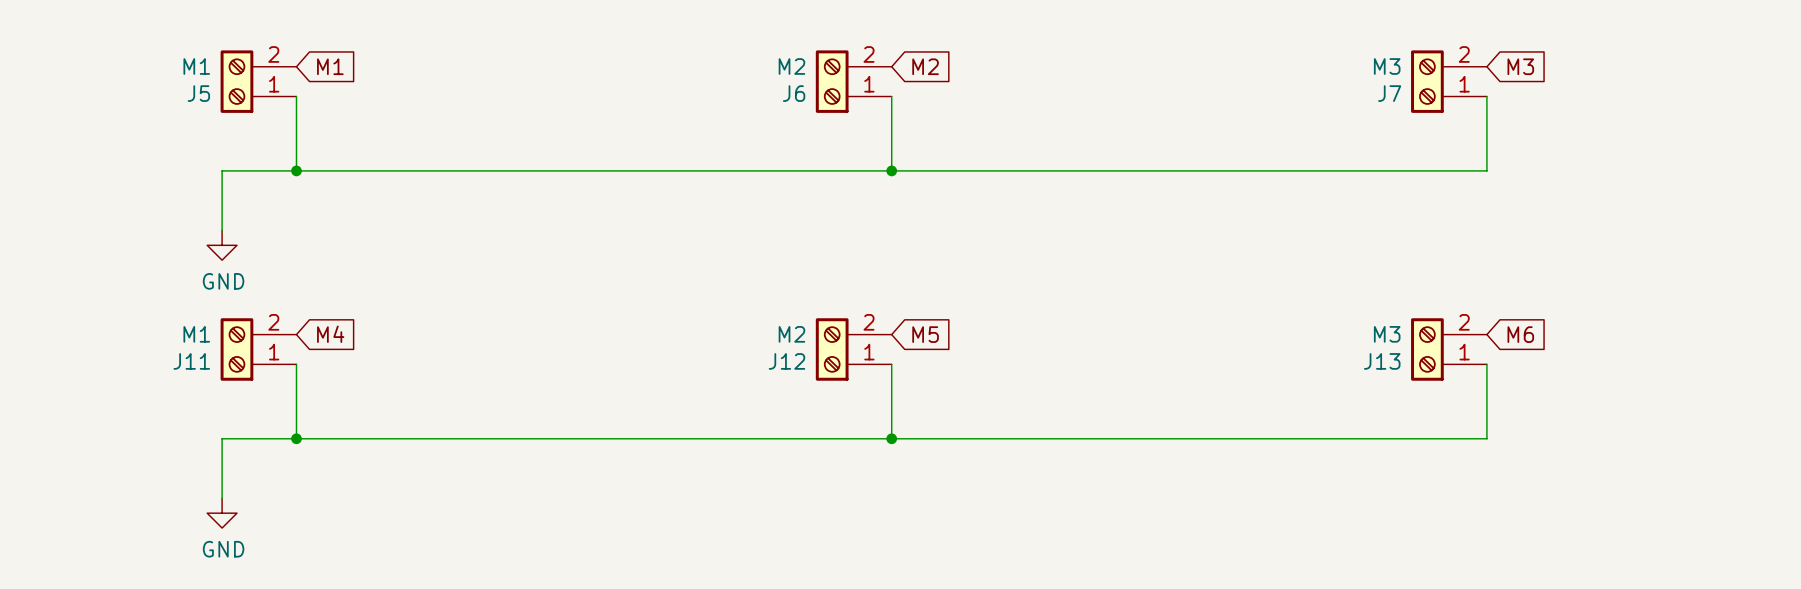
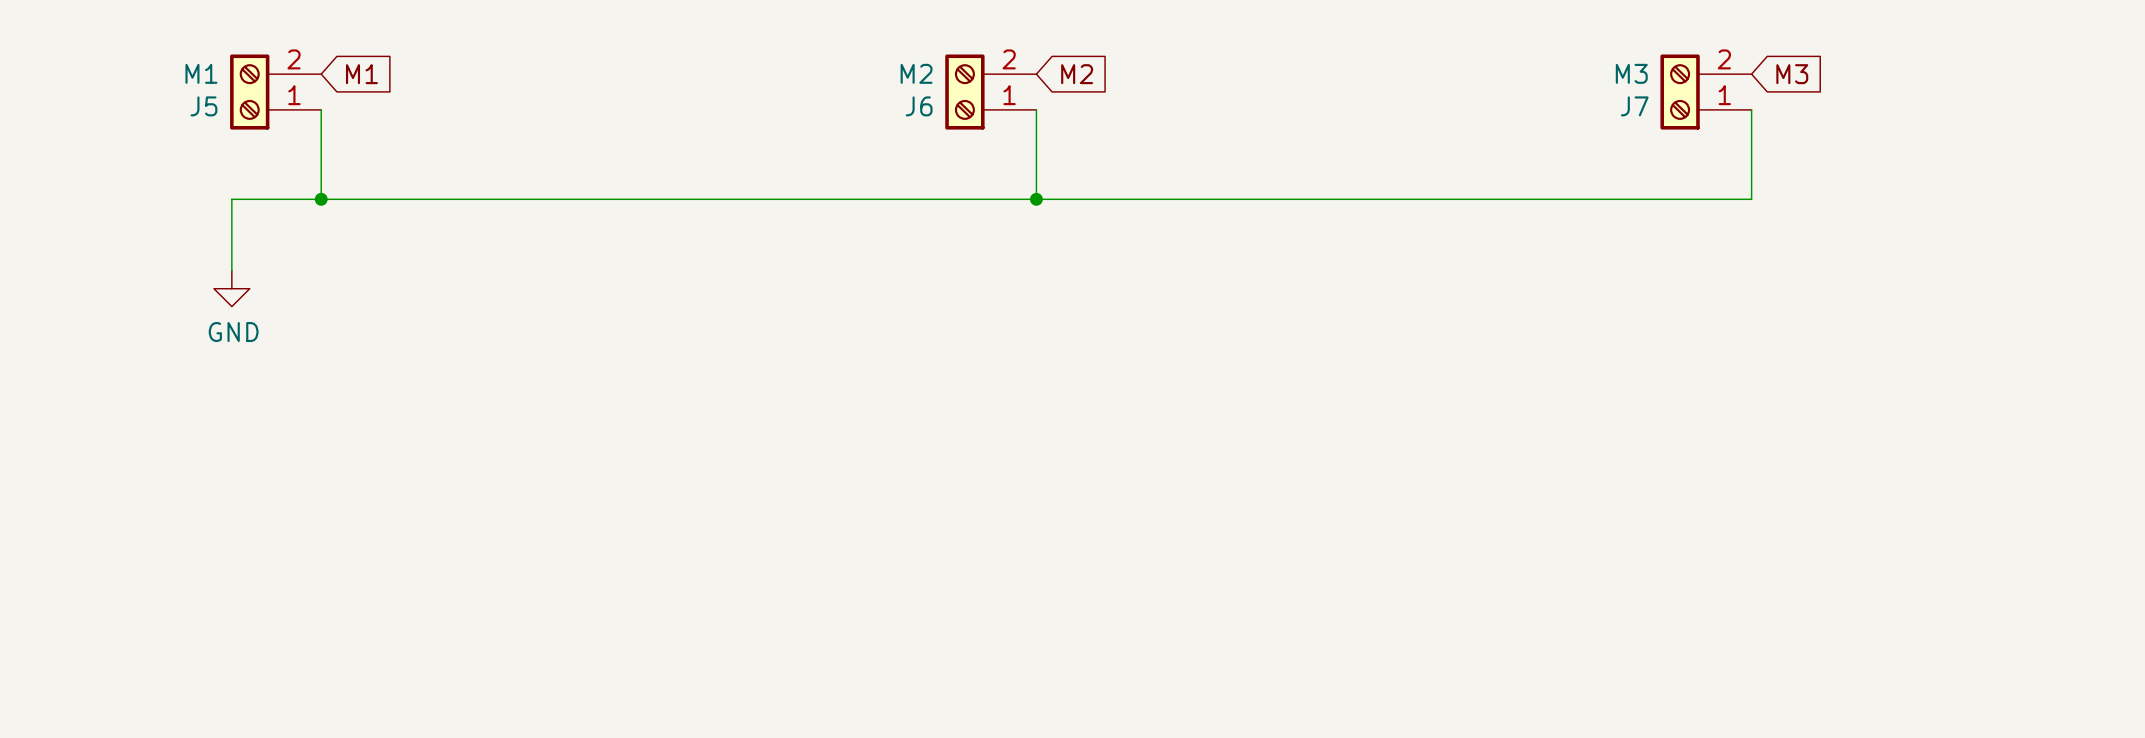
global label: M4 (330, 334) -> none
global label: M5 (925, 334) -> none
global label: M6 (1520, 334) -> none
J11: M1 (258, 349) -> none
J12: M2 (853, 349) -> none
J13: M3 (1448, 349) -> none
wire: (296, 364) (296, 438) -> none
wire: (891, 364) (891, 438) -> none
wire: (1486, 364) (1486, 438) (222, 438) (222, 498) -> none
junction: (296, 438) -> none
junction: (891, 438) -> none
power symbol: GND (222, 513) -> none

